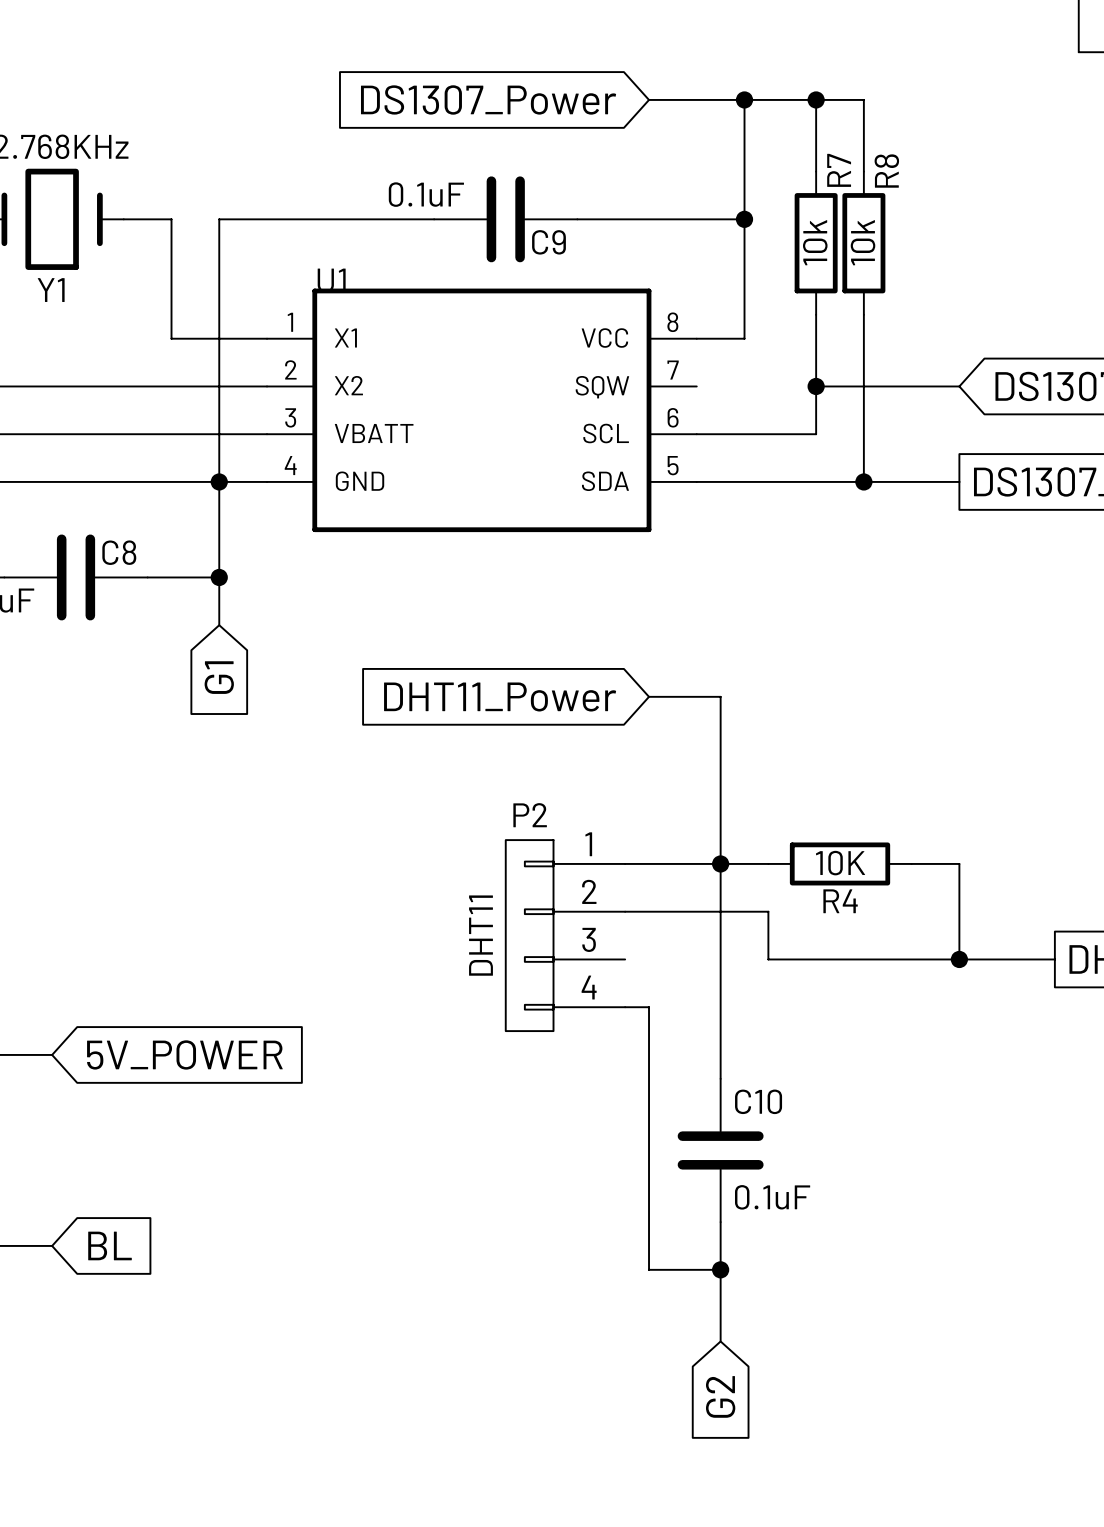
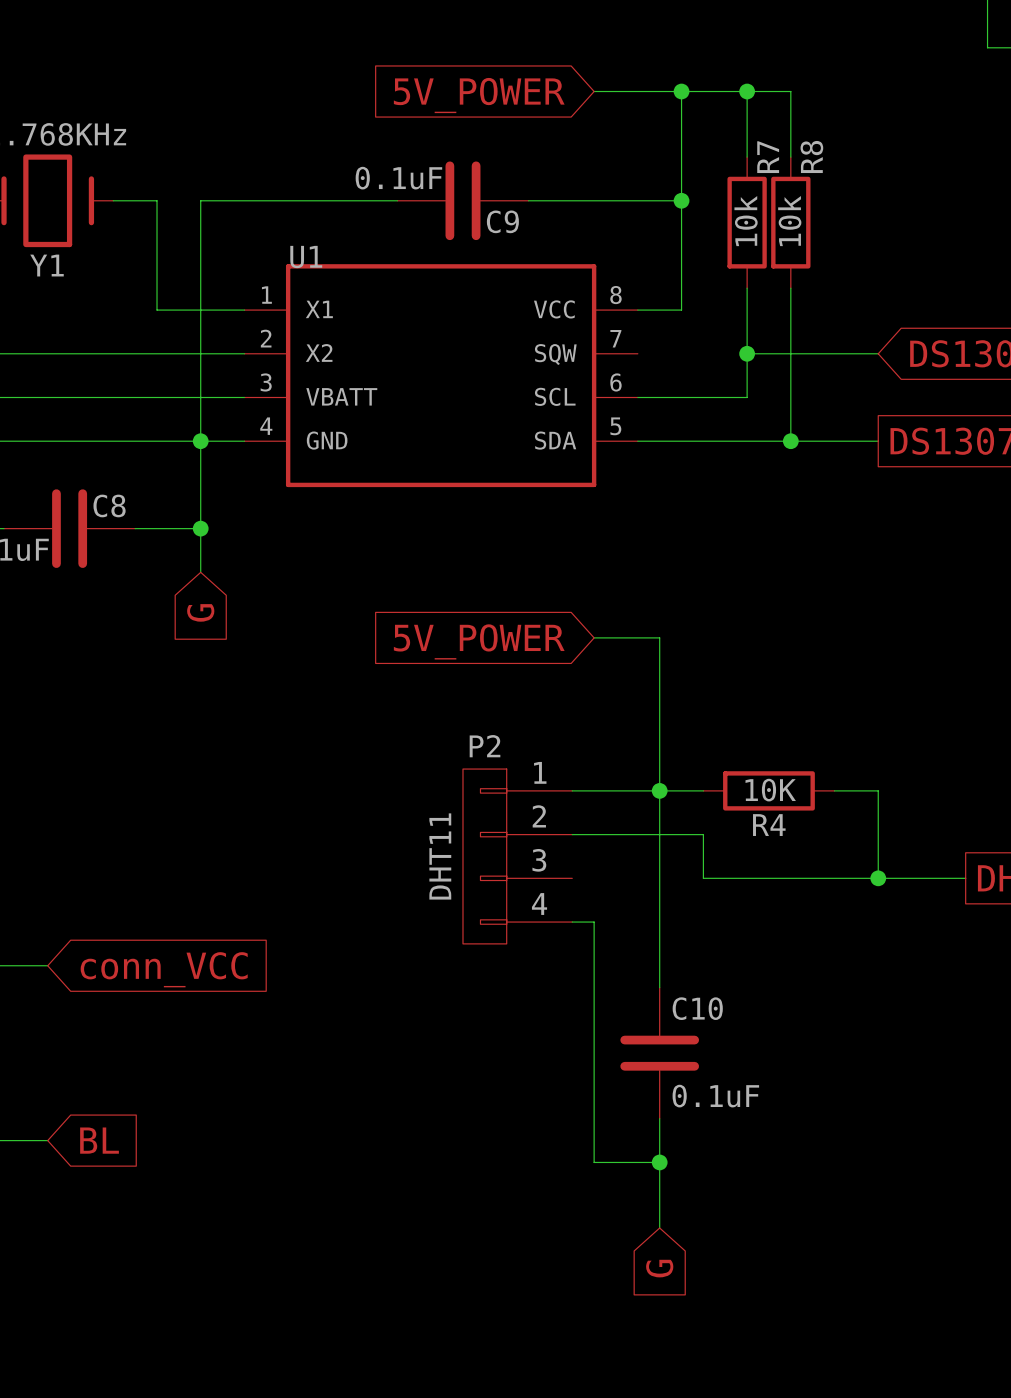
global label: DS1307_Power (488, 99) -> 5V_POWER (479, 95)
global label: G1 (219, 677) -> G (200, 612)
global label: DHT11_Power (500, 697) -> 5V_POWER (479, 641)
global label: 5V_POWER (184, 1054) -> conn_VCC (164, 969)
global label: G2 (720, 1396) -> G (659, 1268)

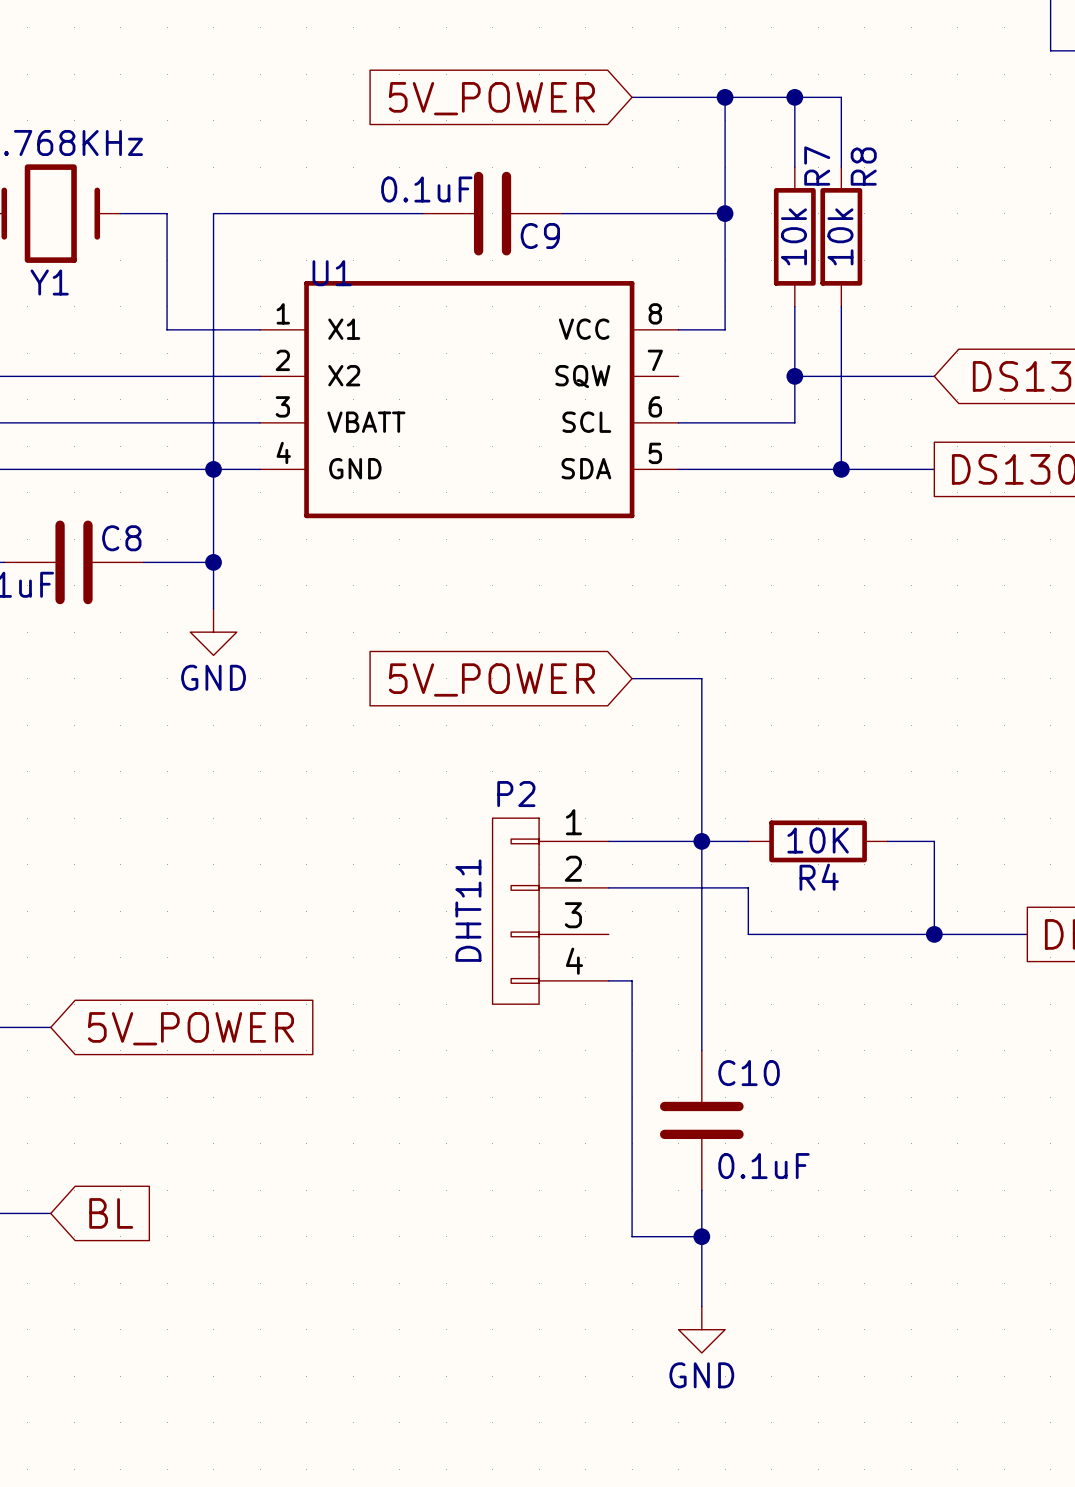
power symbol: none -> GND (213, 632)
global label: G (200, 612) -> none
global label: conn_VCC (164, 969) -> 5V_POWER (190, 1028)
power symbol: none -> GND (701, 1329)
global label: G (659, 1268) -> none

